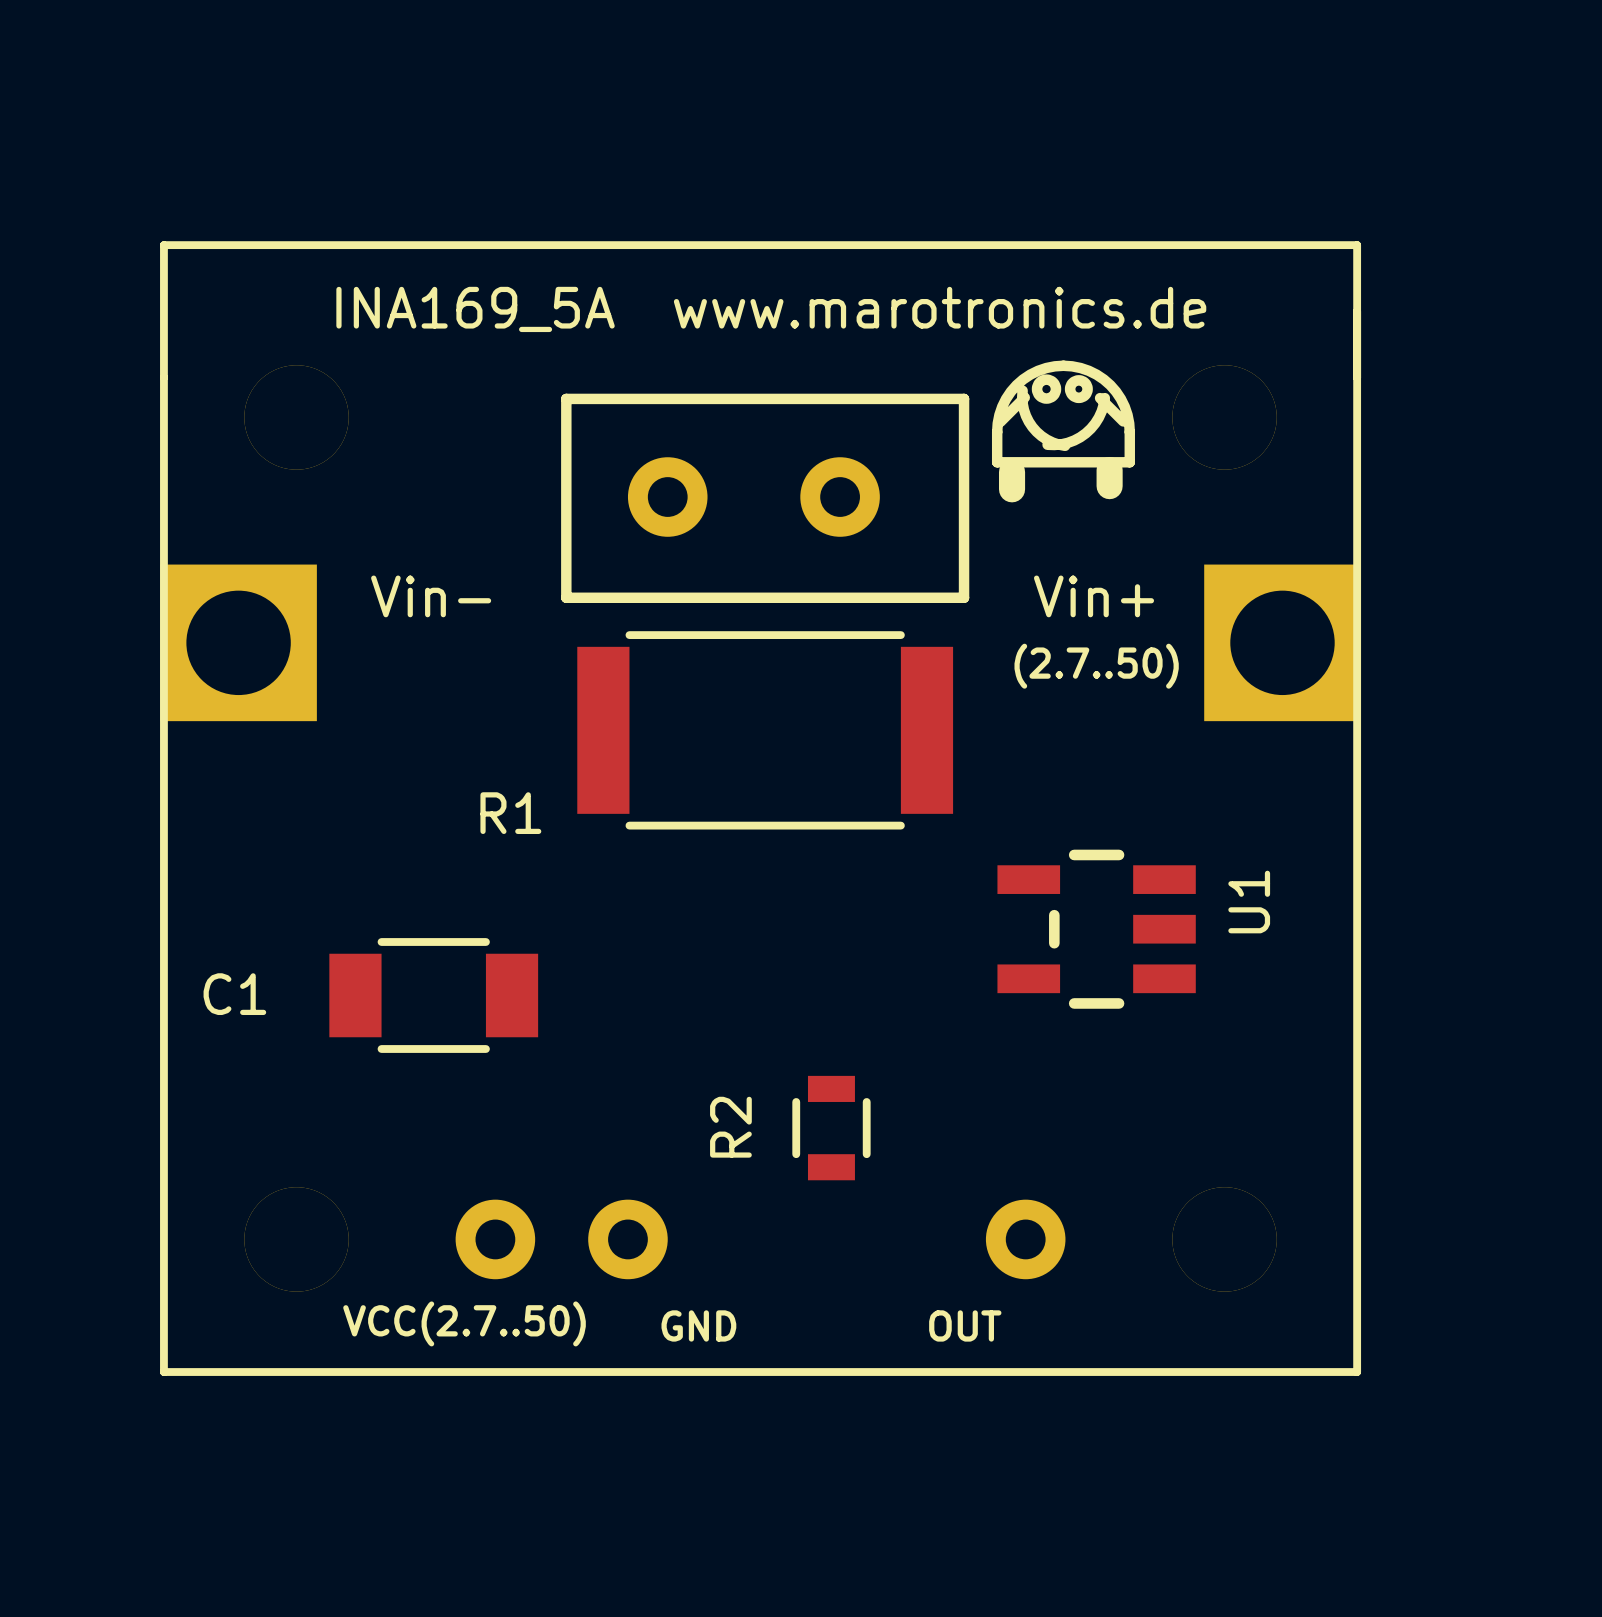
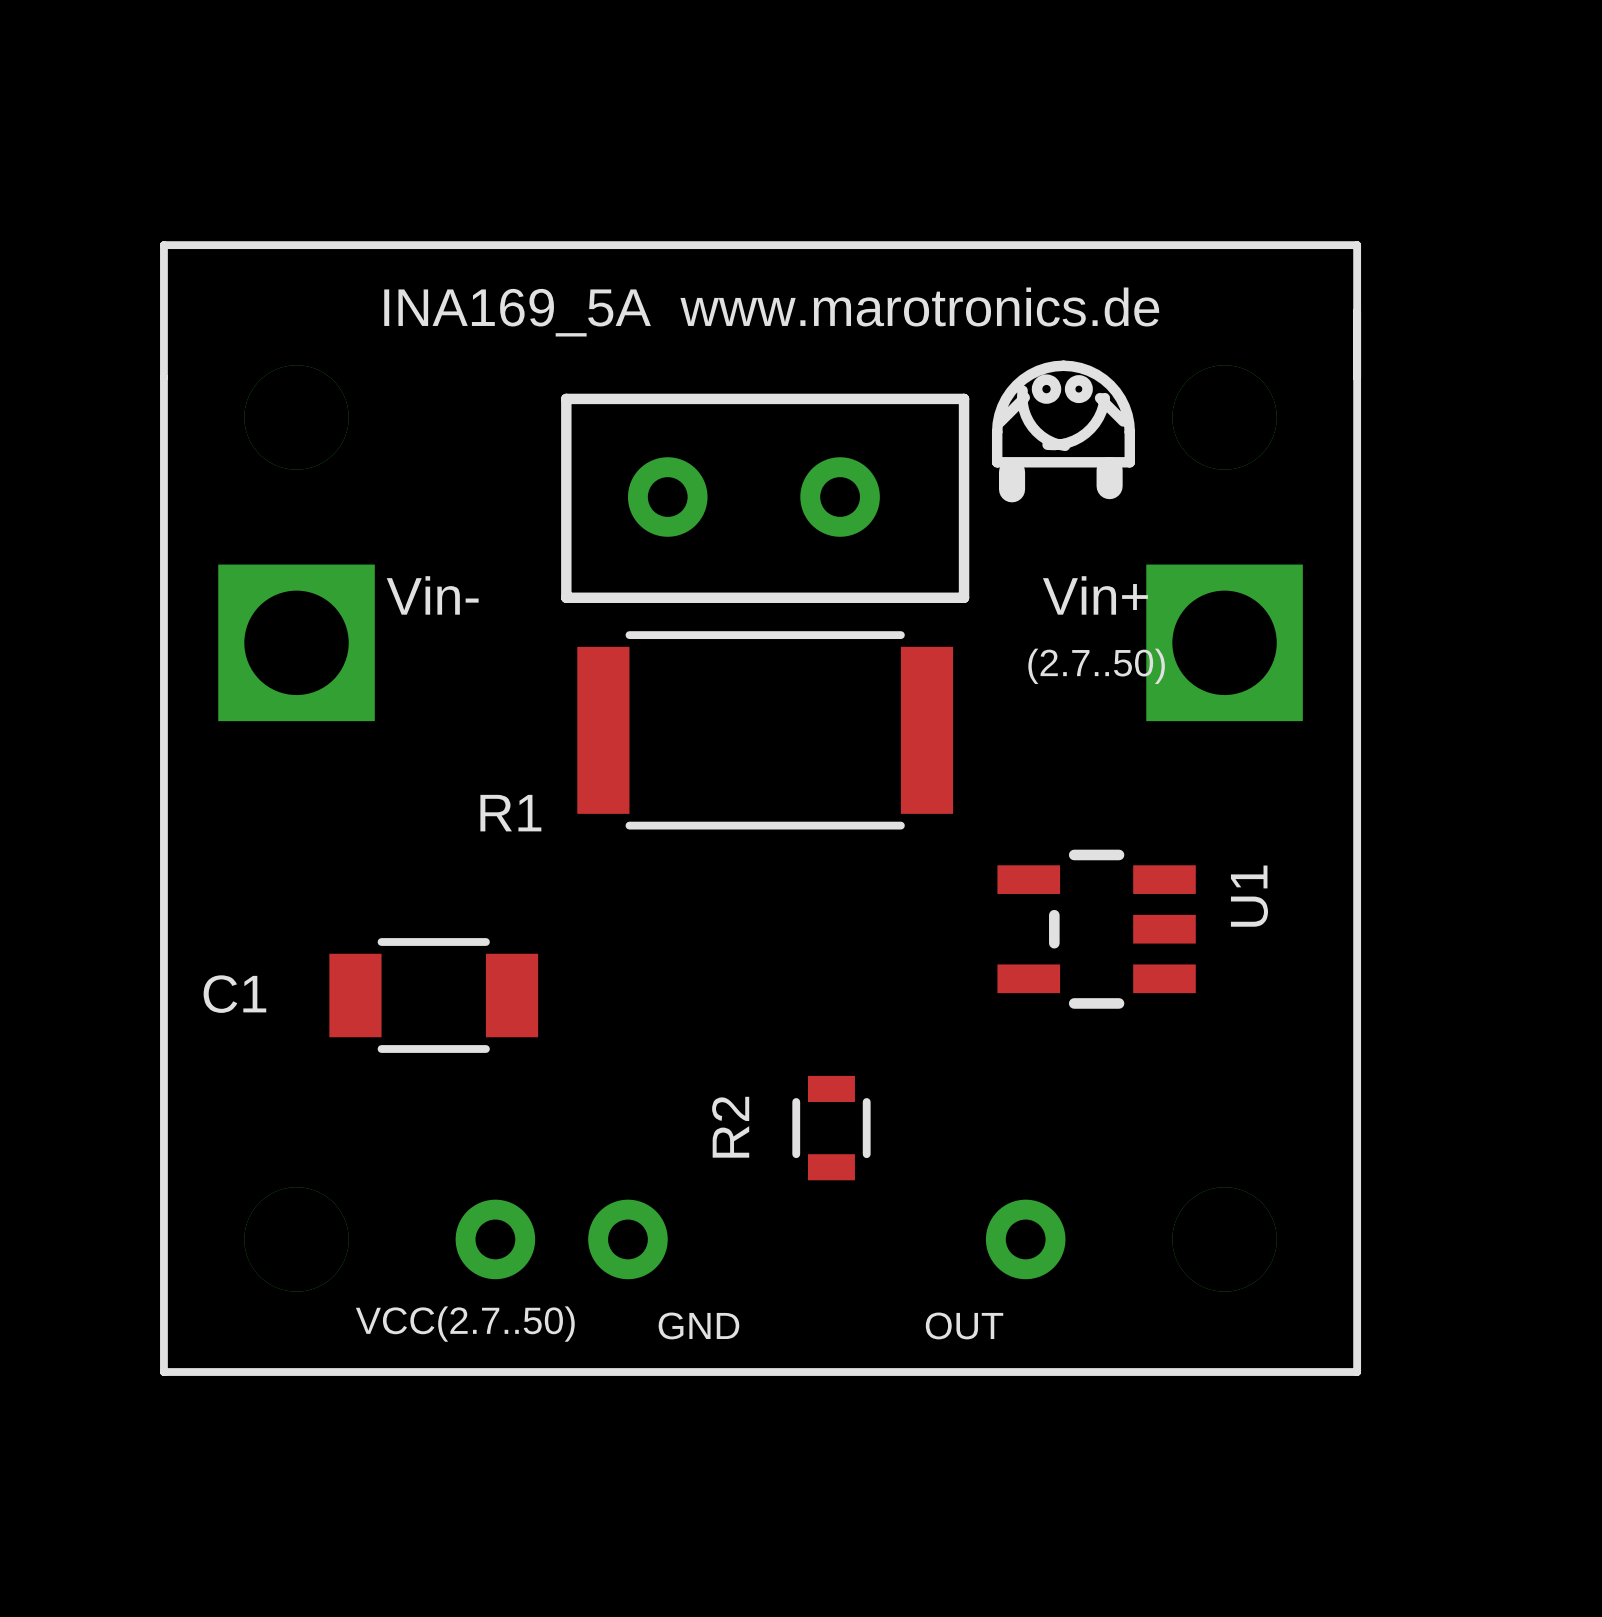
part footprint: [160, 241, 1362, 1376] -> [160, 241, 1362, 1376]

